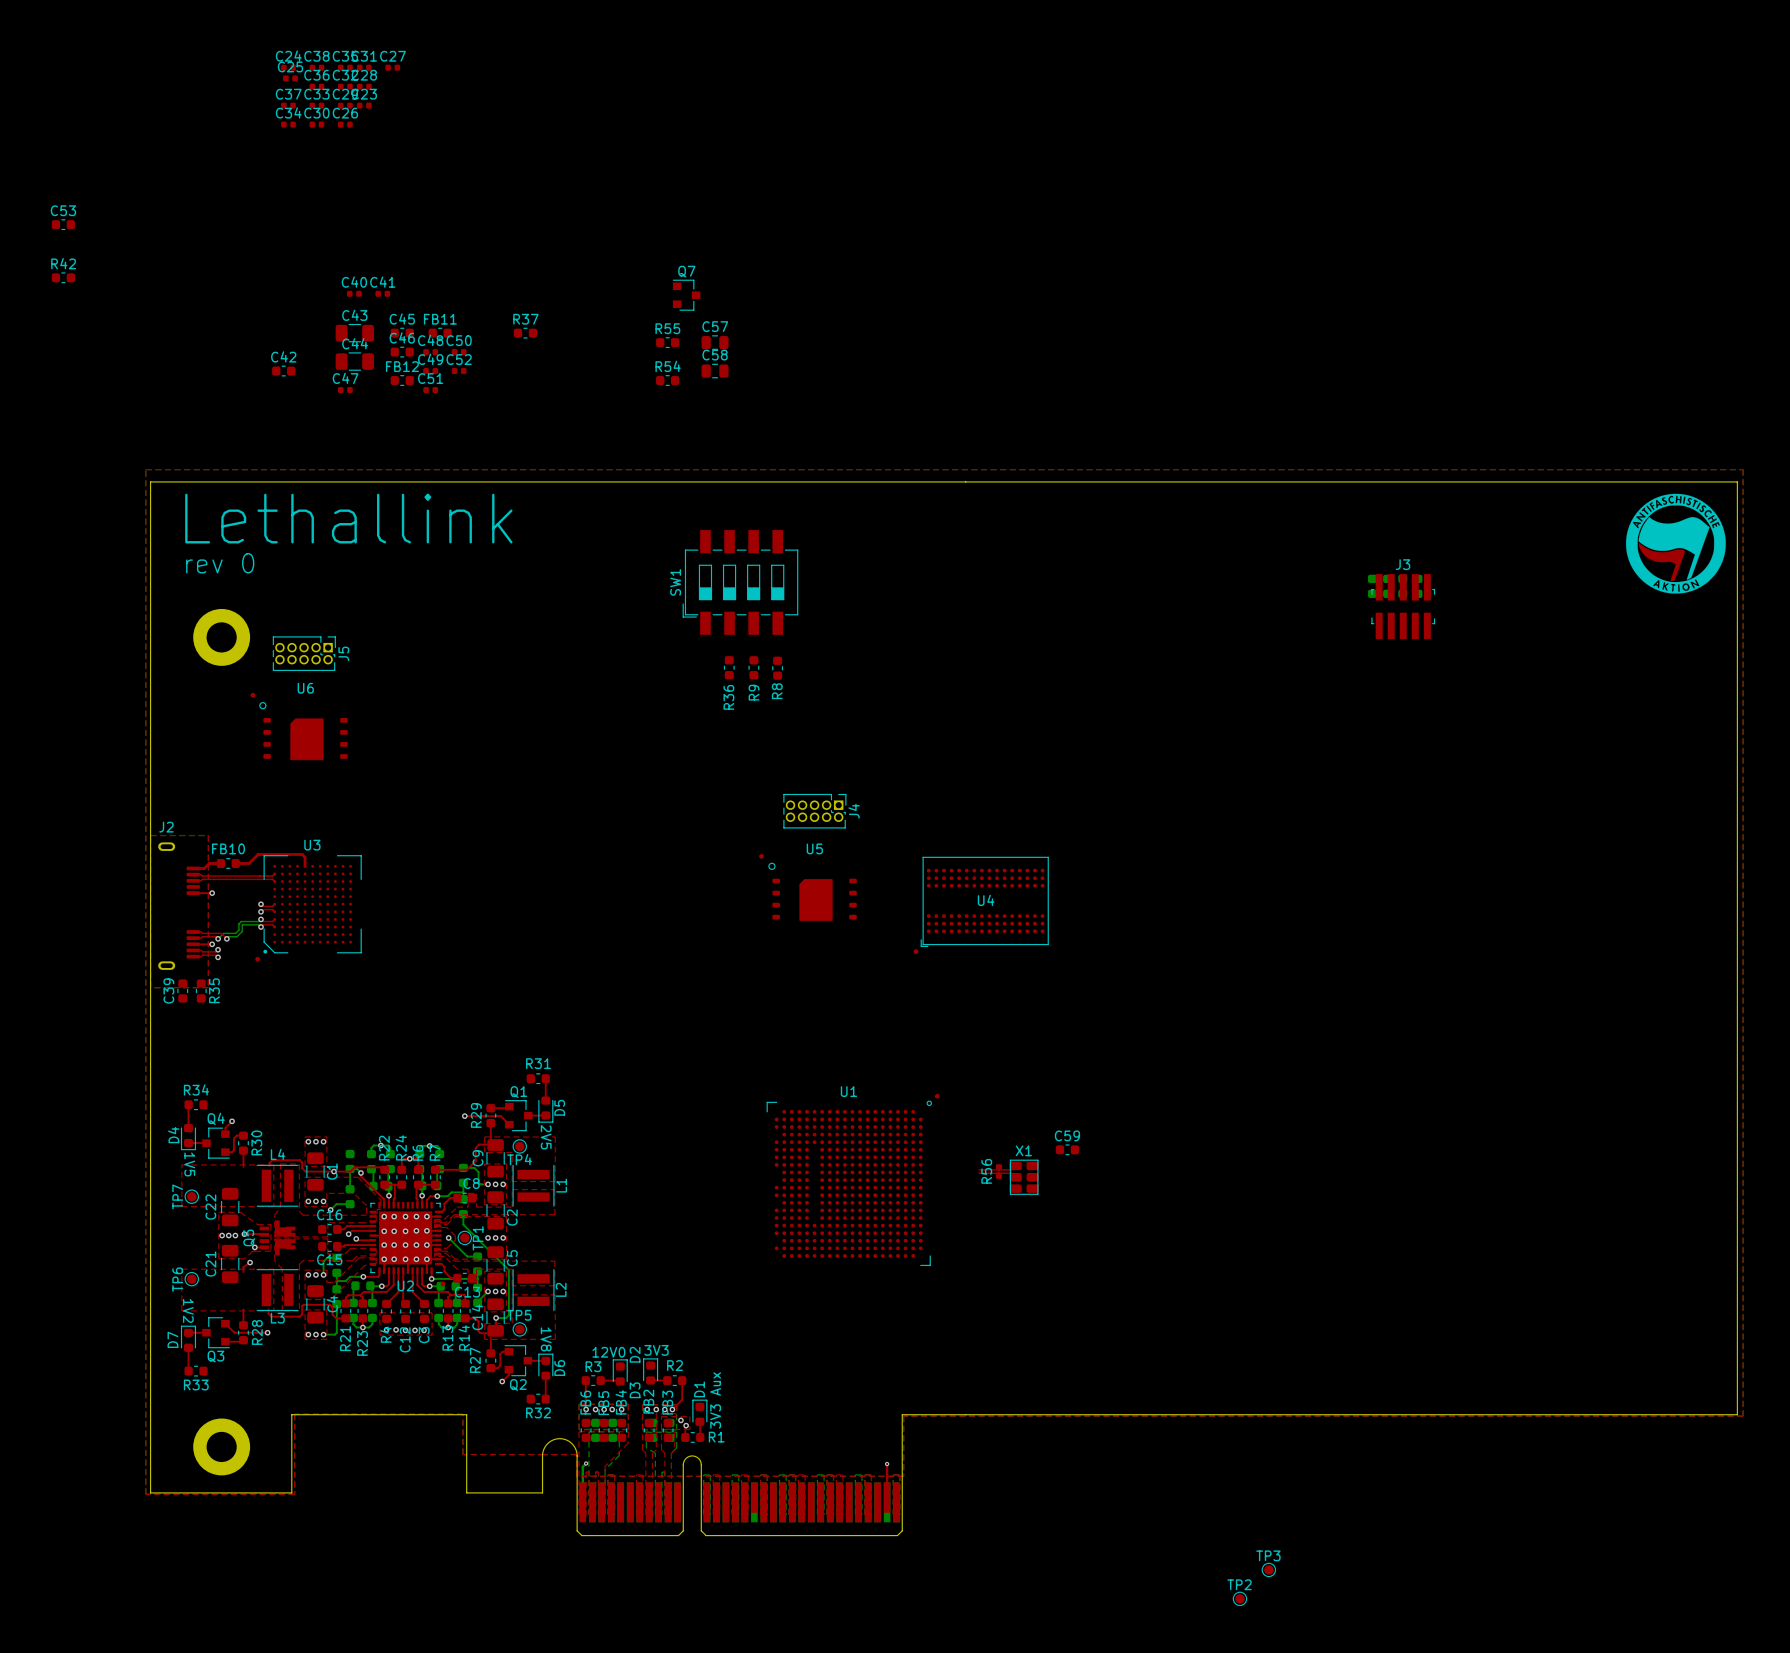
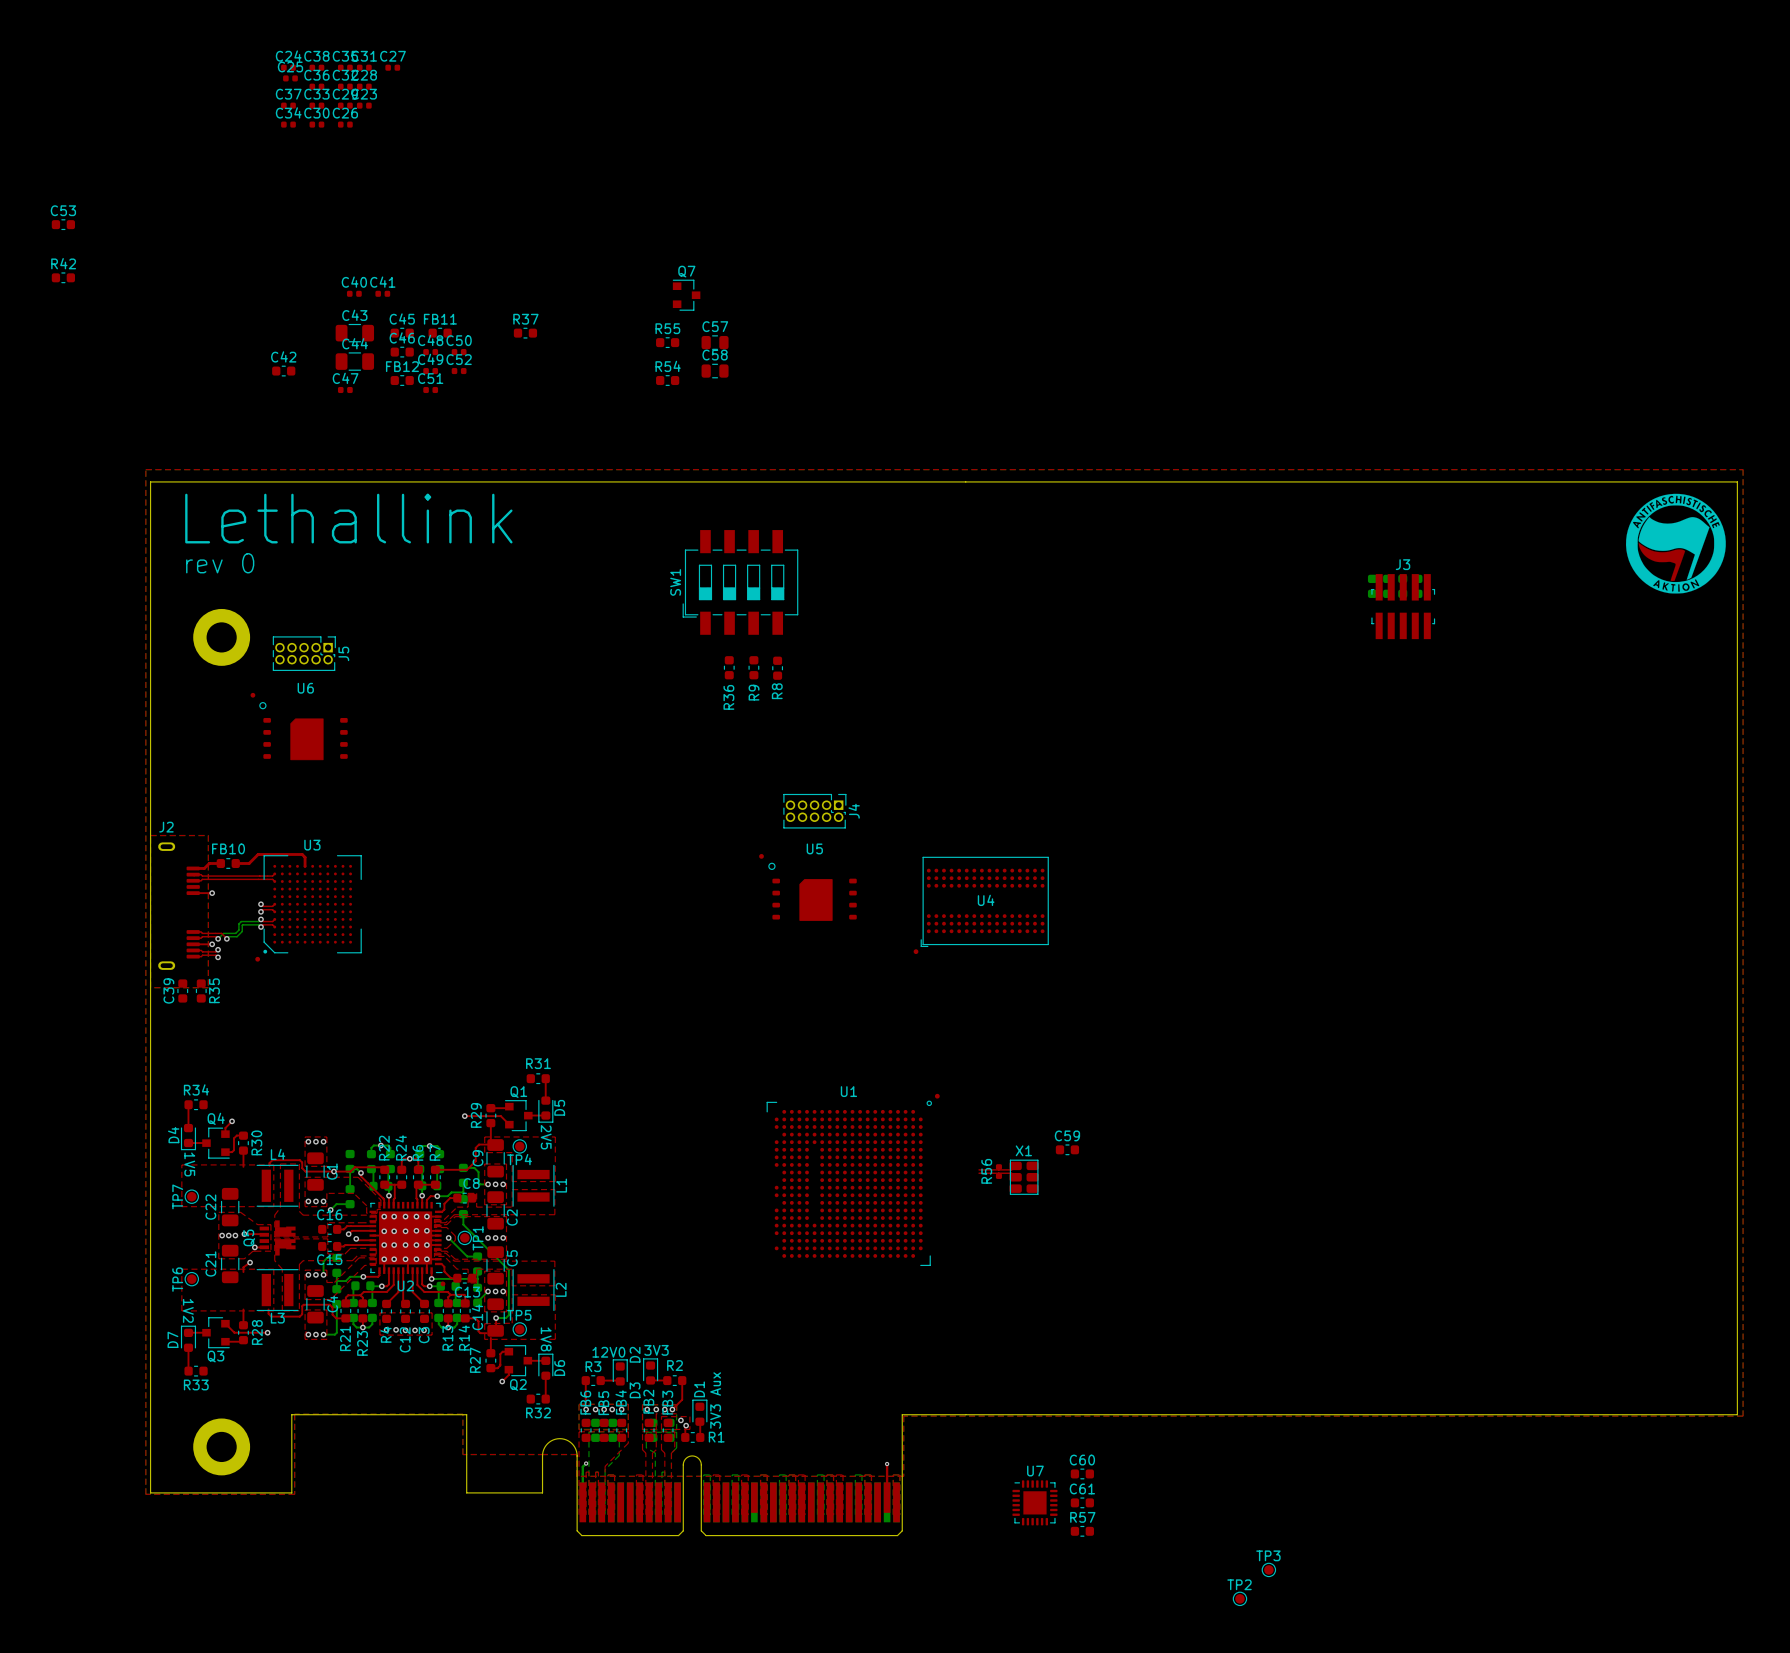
C60: none -> (1082, 1473)
U7: none -> (1034, 1502)
C61: none -> (1082, 1502)
R57: none -> (1082, 1531)

